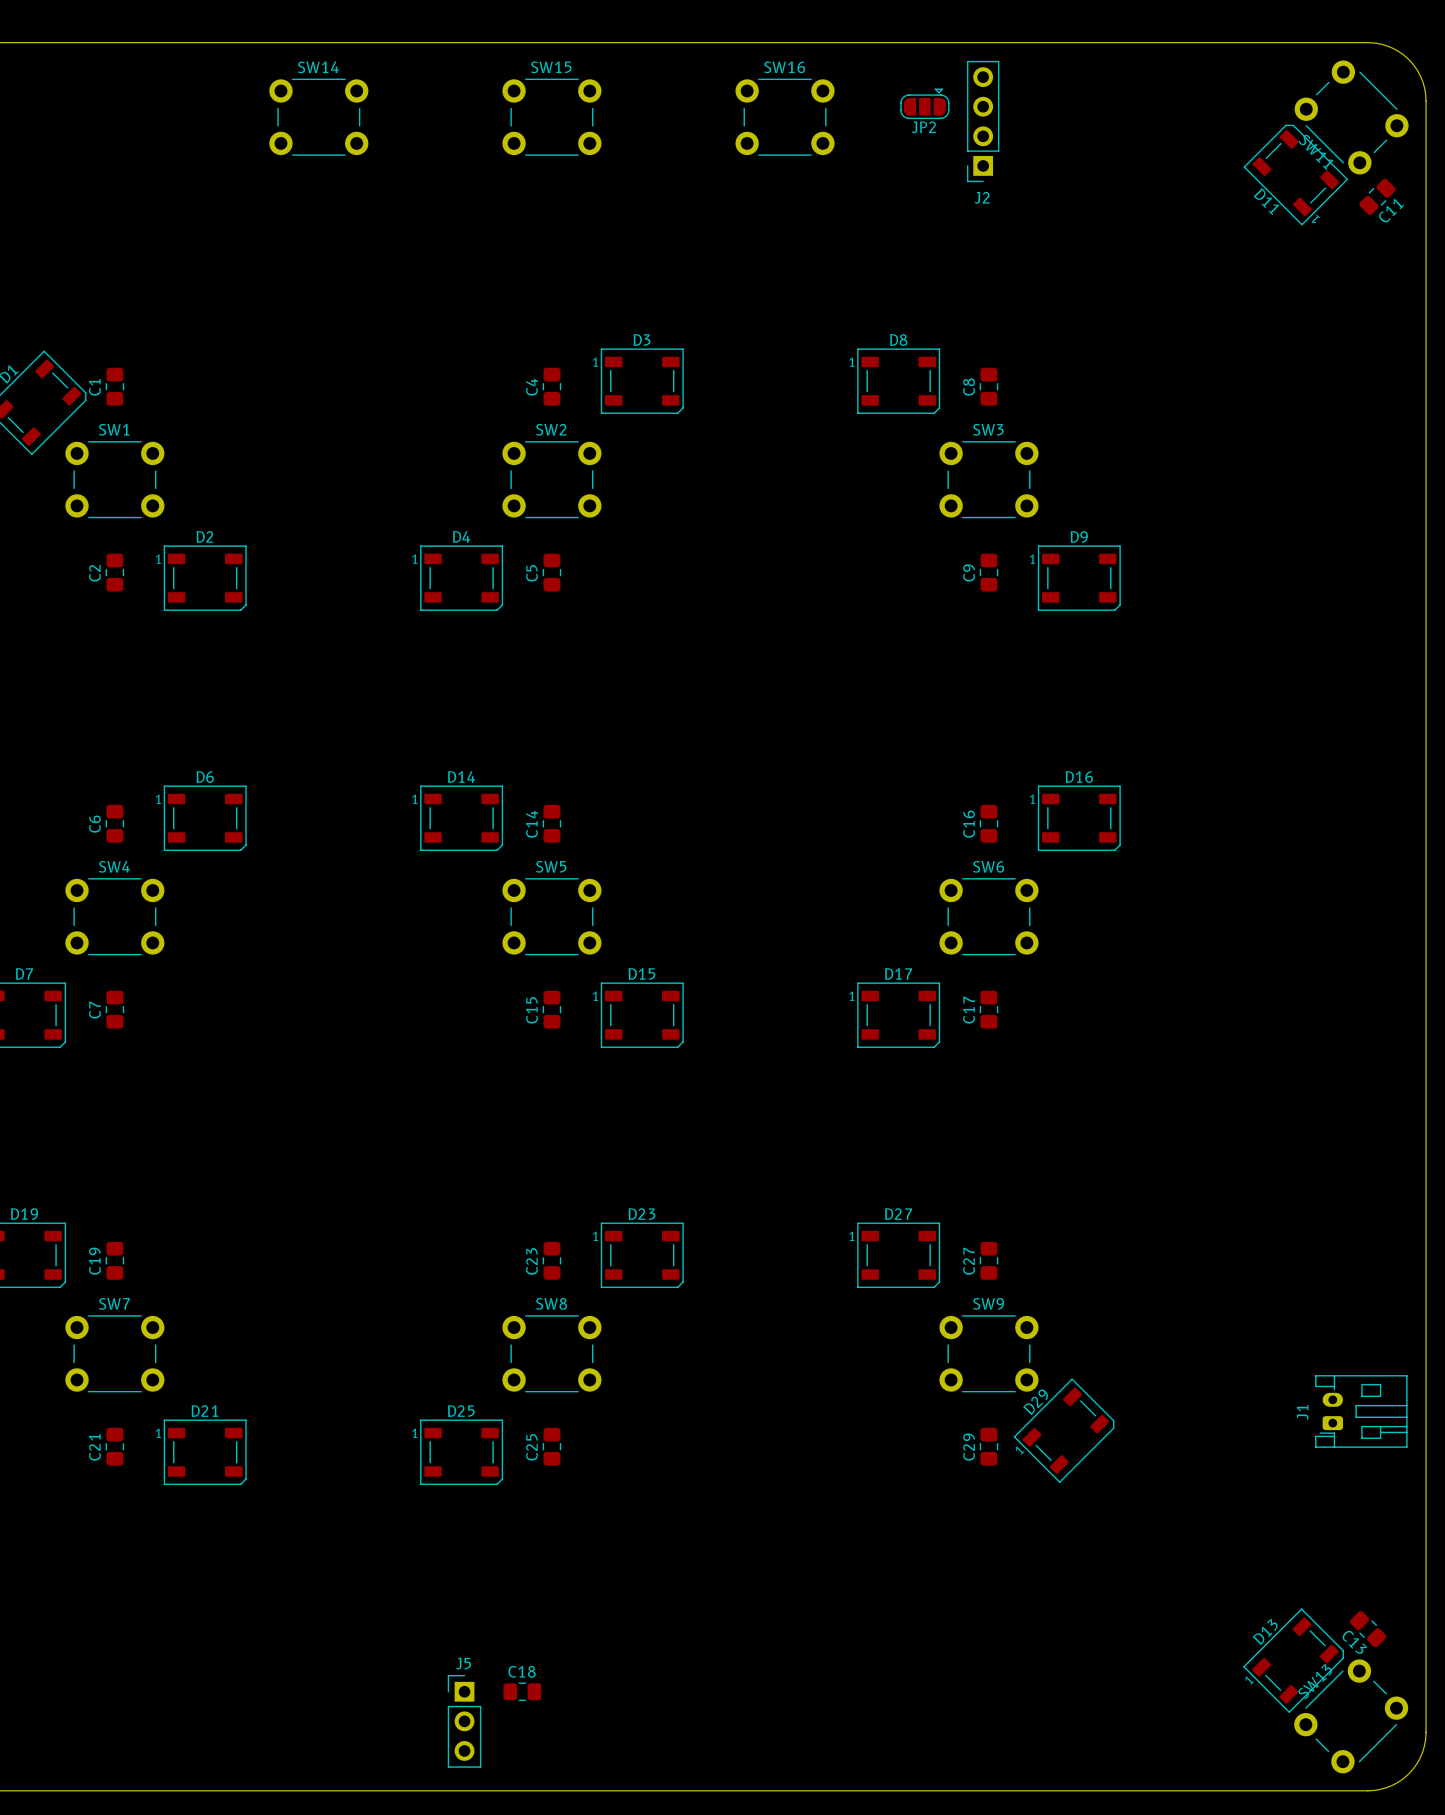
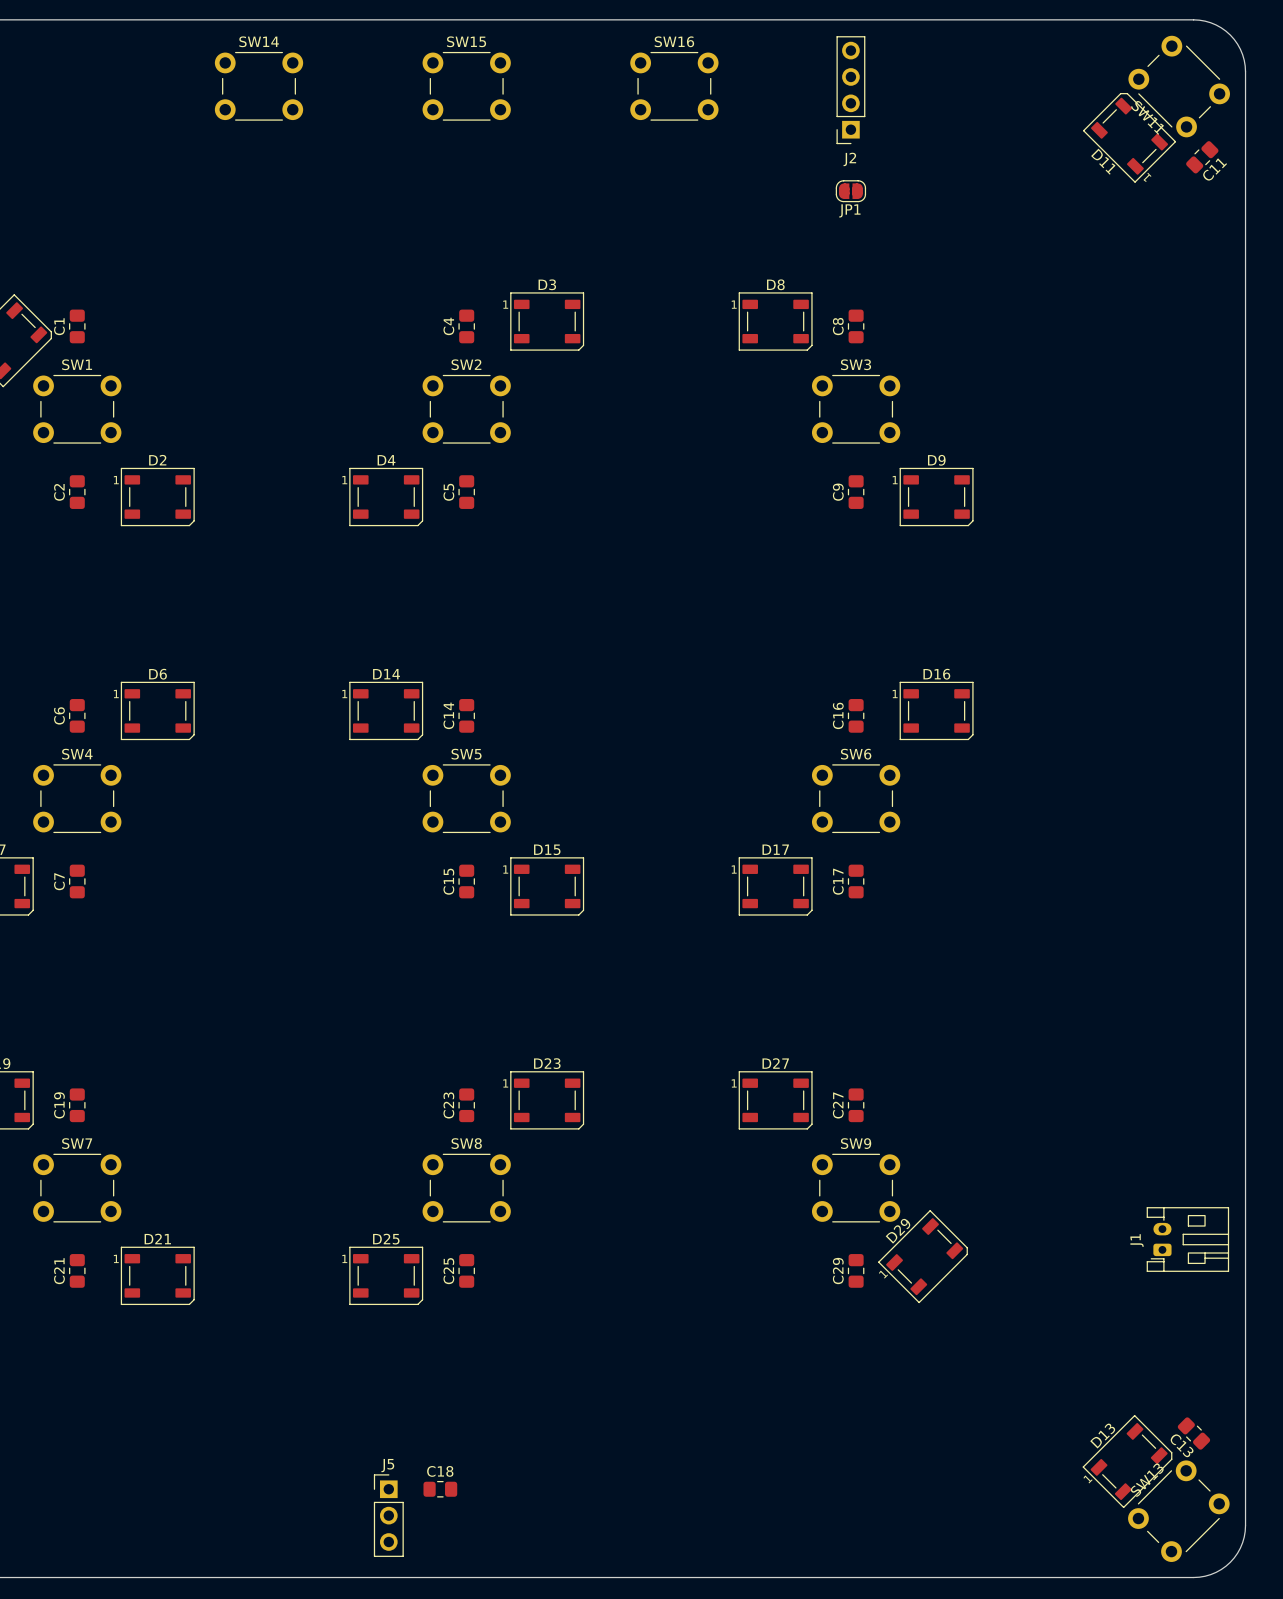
JP2: (924, 103) -> none
JP1: none -> (850, 191)

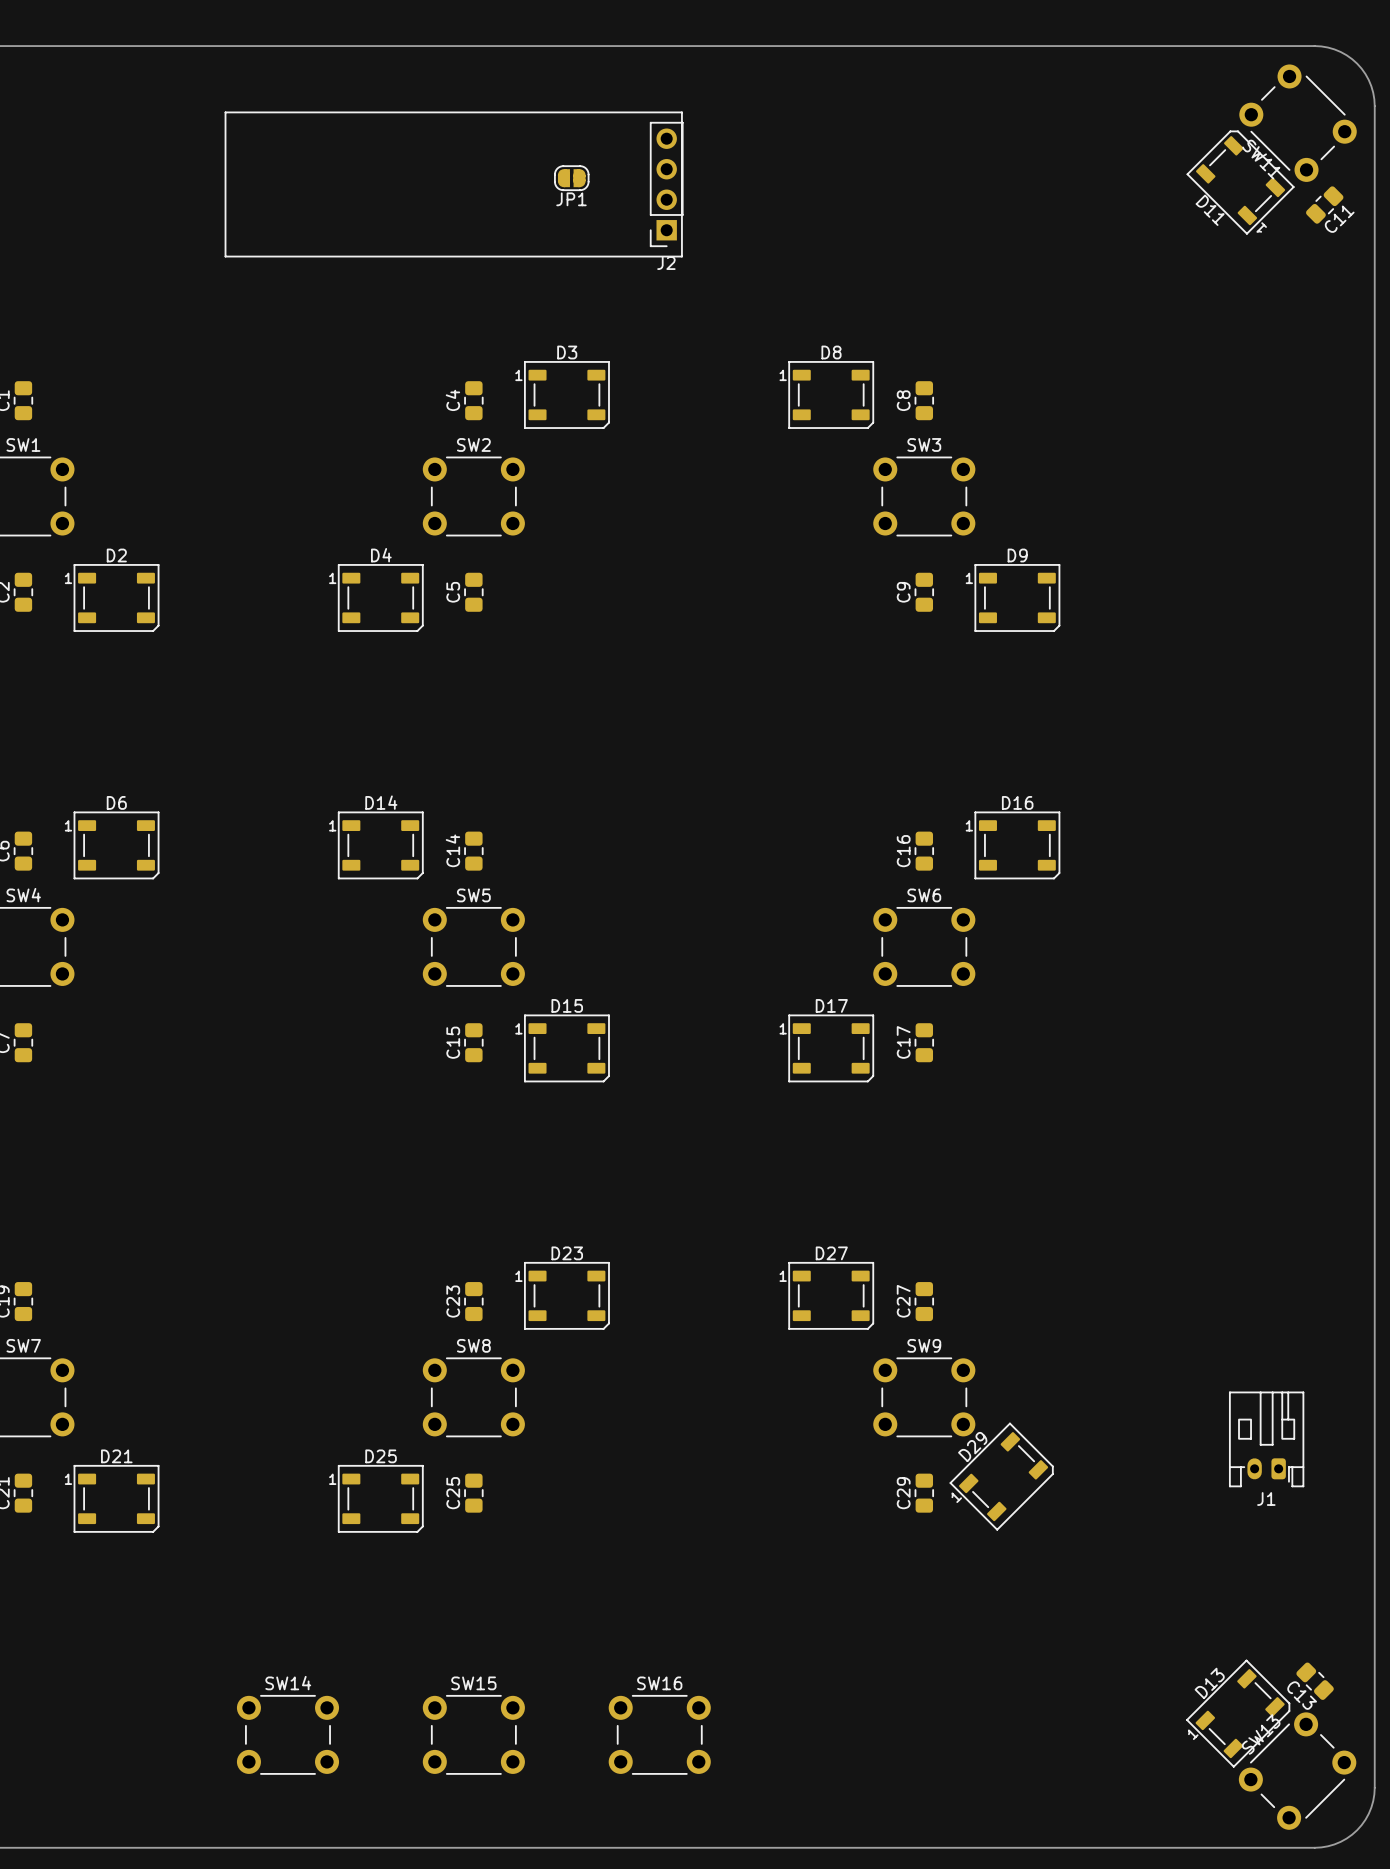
line: none -> (225, 112) (681, 112) (681, 256) (225, 256) (225, 112)
SW14 position: (259, 86) -> (287, 1734)
SW15 position: (466, 86) -> (473, 1734)
SW16 position: (674, 86) -> (659, 1734)
J2 position: (850, 90) -> (666, 184)
JP1 position: (850, 191) -> (571, 178)
J1 rotation: 0° (1187, 1239) -> 90° counterclockwise (1266, 1439)
C18: (440, 1489) -> none
J5: (388, 1515) -> none

